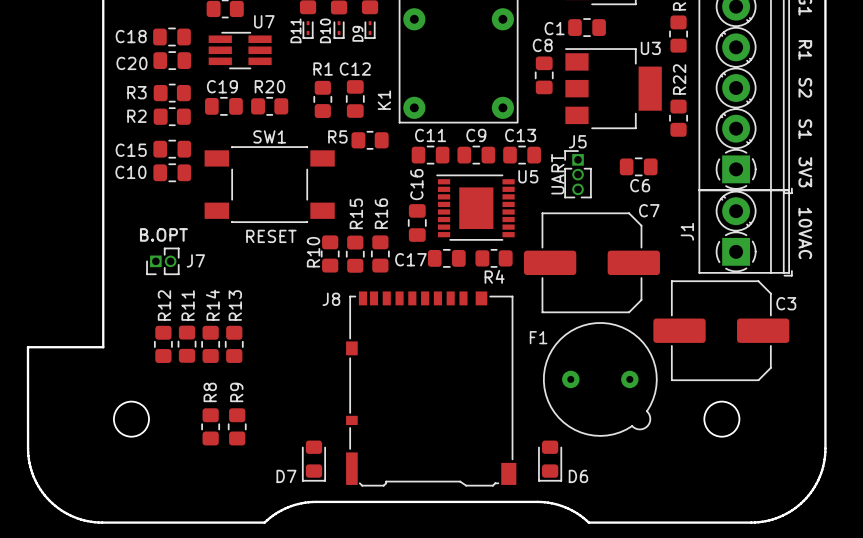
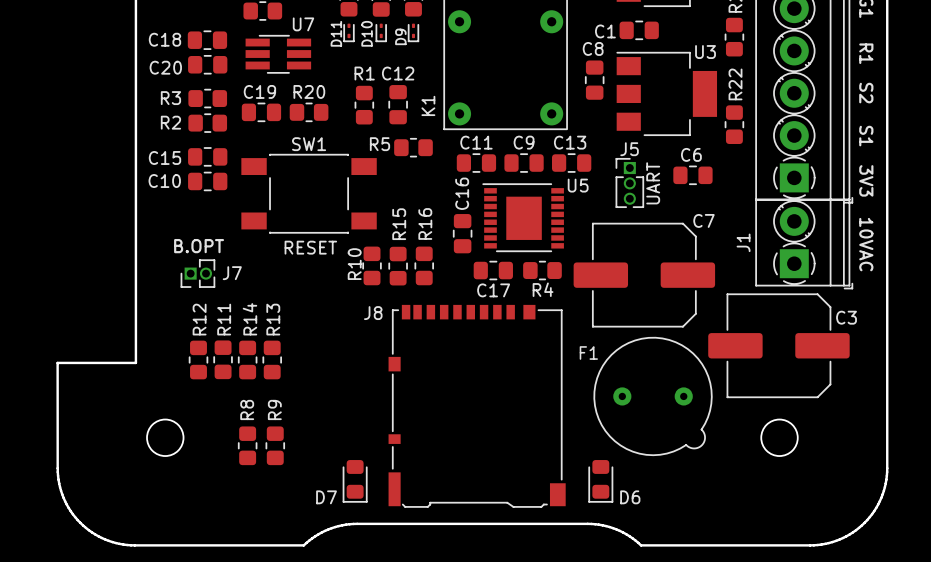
text position: UART (557, 174) -> UART (653, 183)
C6 name position: C6 (640, 185) -> C6 (691, 154)
C17 name position: C17 (410, 259) -> C17 (493, 290)

